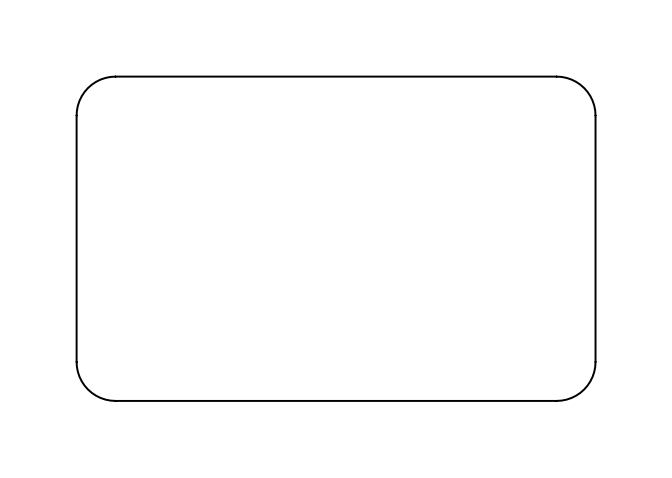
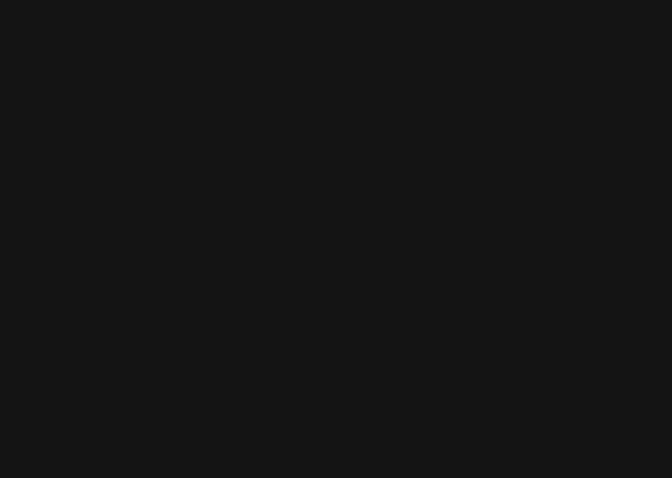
board edge: (115, 76) (556, 76) (576, 81) (590, 96) (595, 115) (595, 362) (590, 381) (576, 395) (556, 400) (115, 400) (96, 395) (84, 385) (76, 367) (76, 115) (79, 100) (88, 88) (100, 79) (115, 76) -> none

